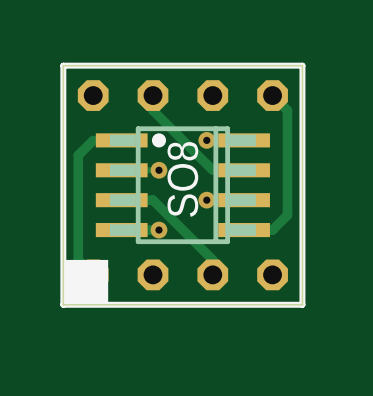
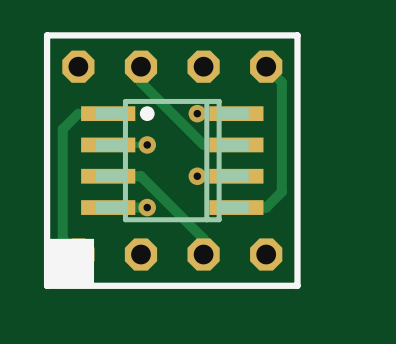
board edge: (63, 65) (302, 65) (302, 304) (63, 304) (63, 65) -> none
text: SO8 (182, 179) -> none

